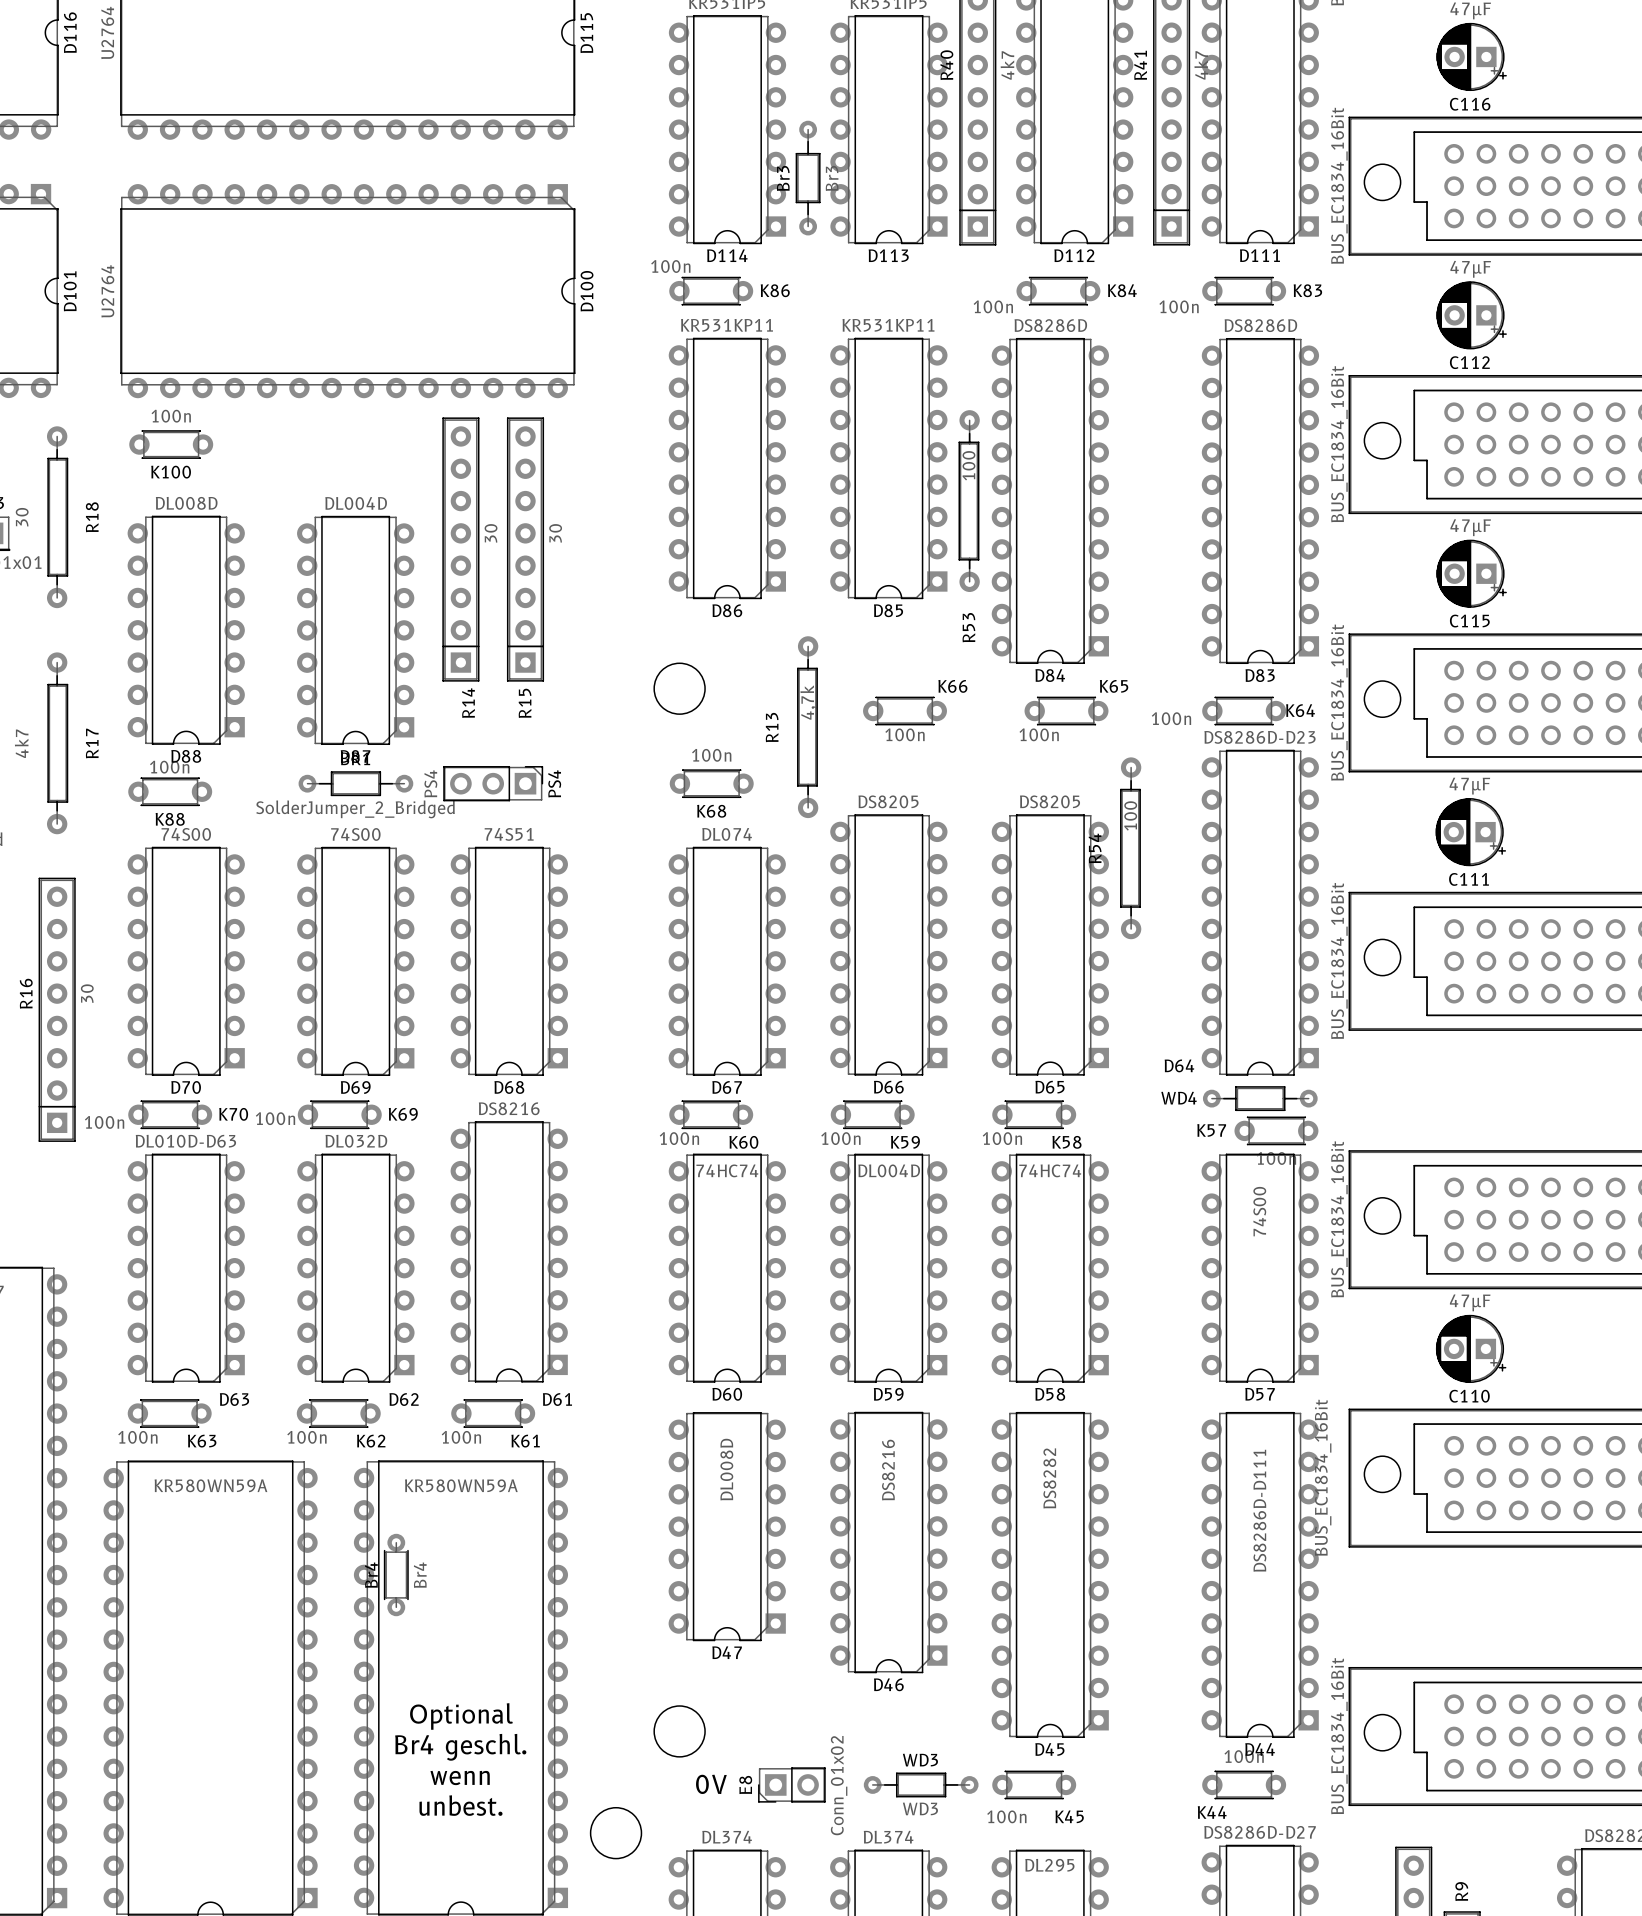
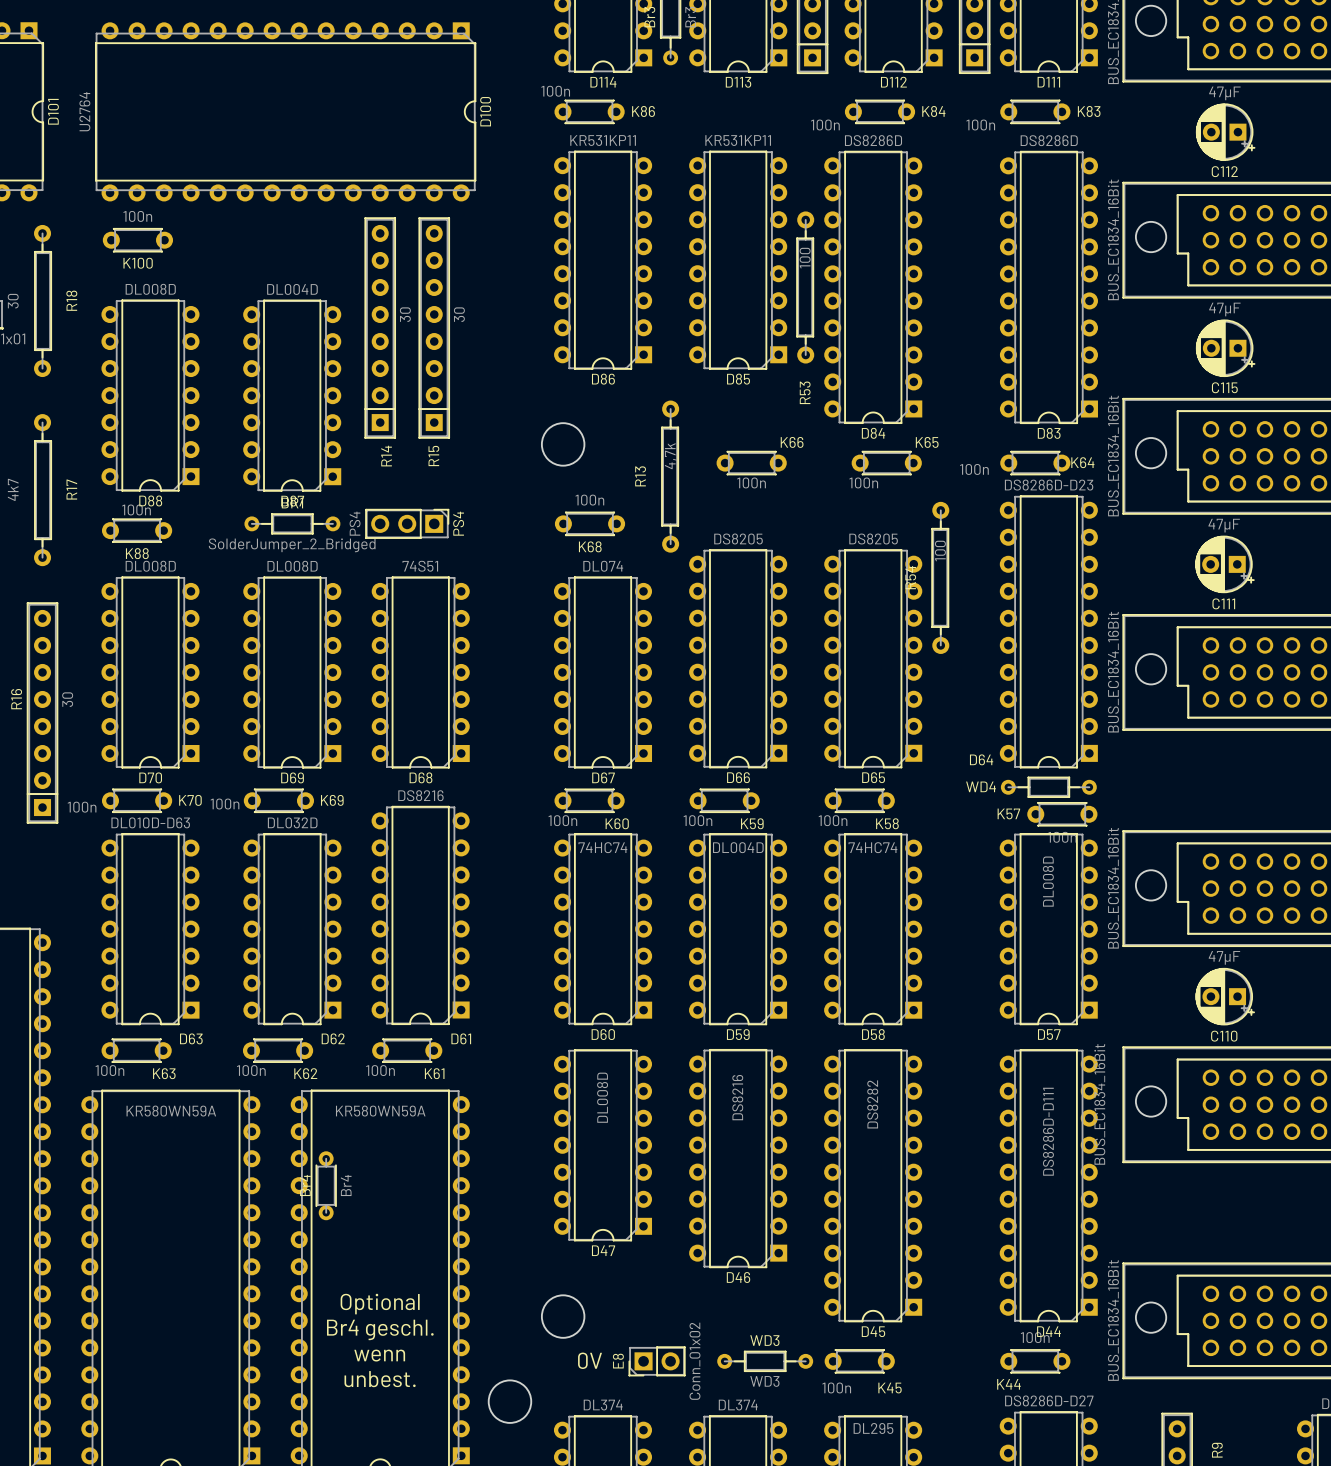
D70 value: 74S00 (186, 834) -> DL008D (150, 566)
D69 value: 74S00 (355, 834) -> DL008D (292, 566)
D57 value: 74S00 (1259, 1211) -> DL008D (1048, 881)

